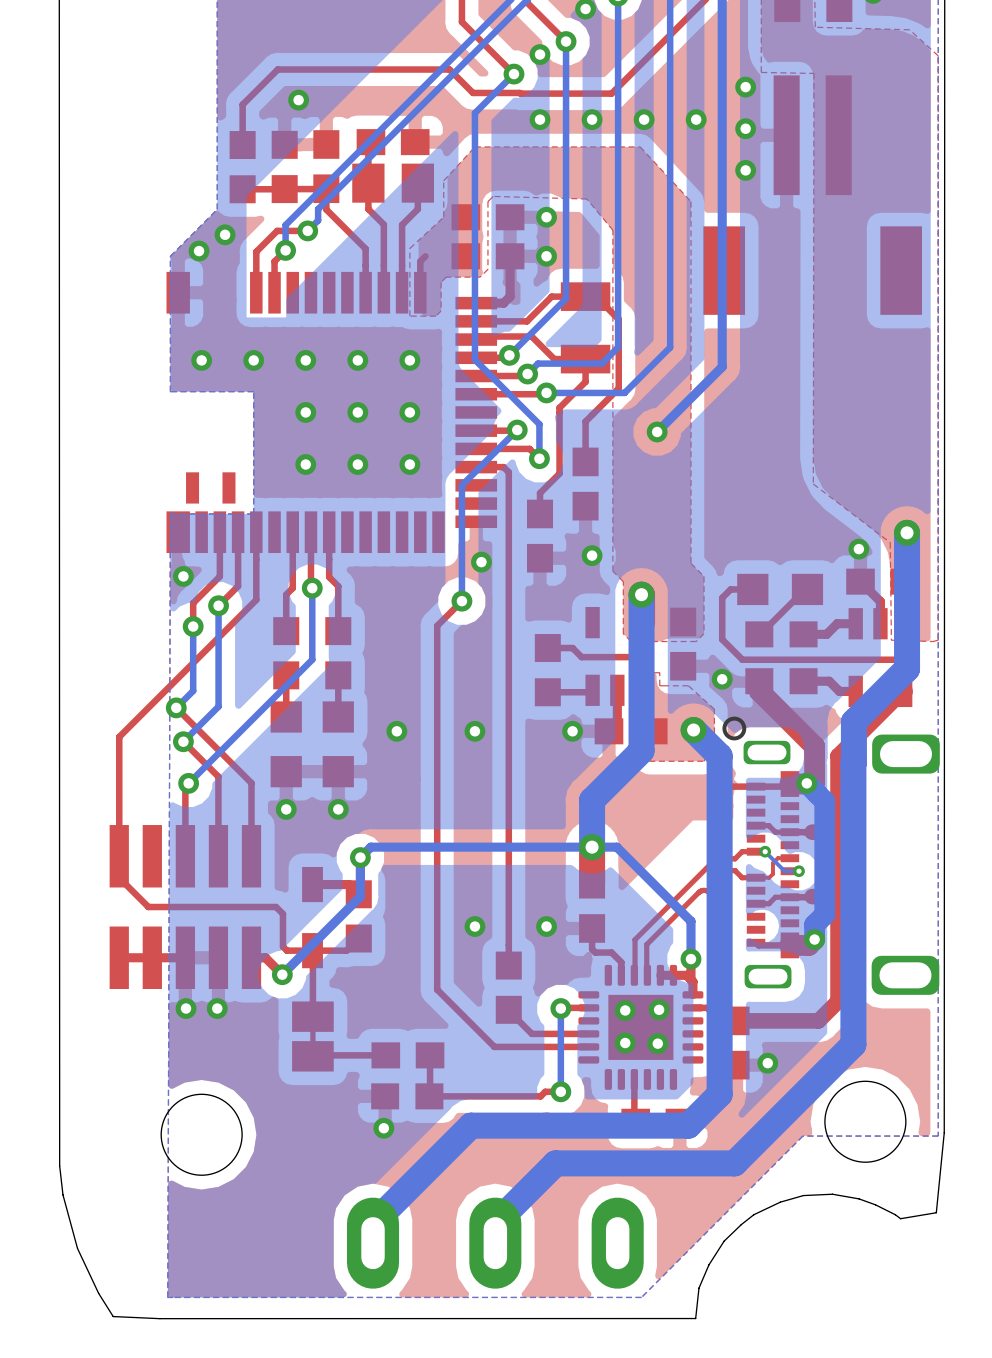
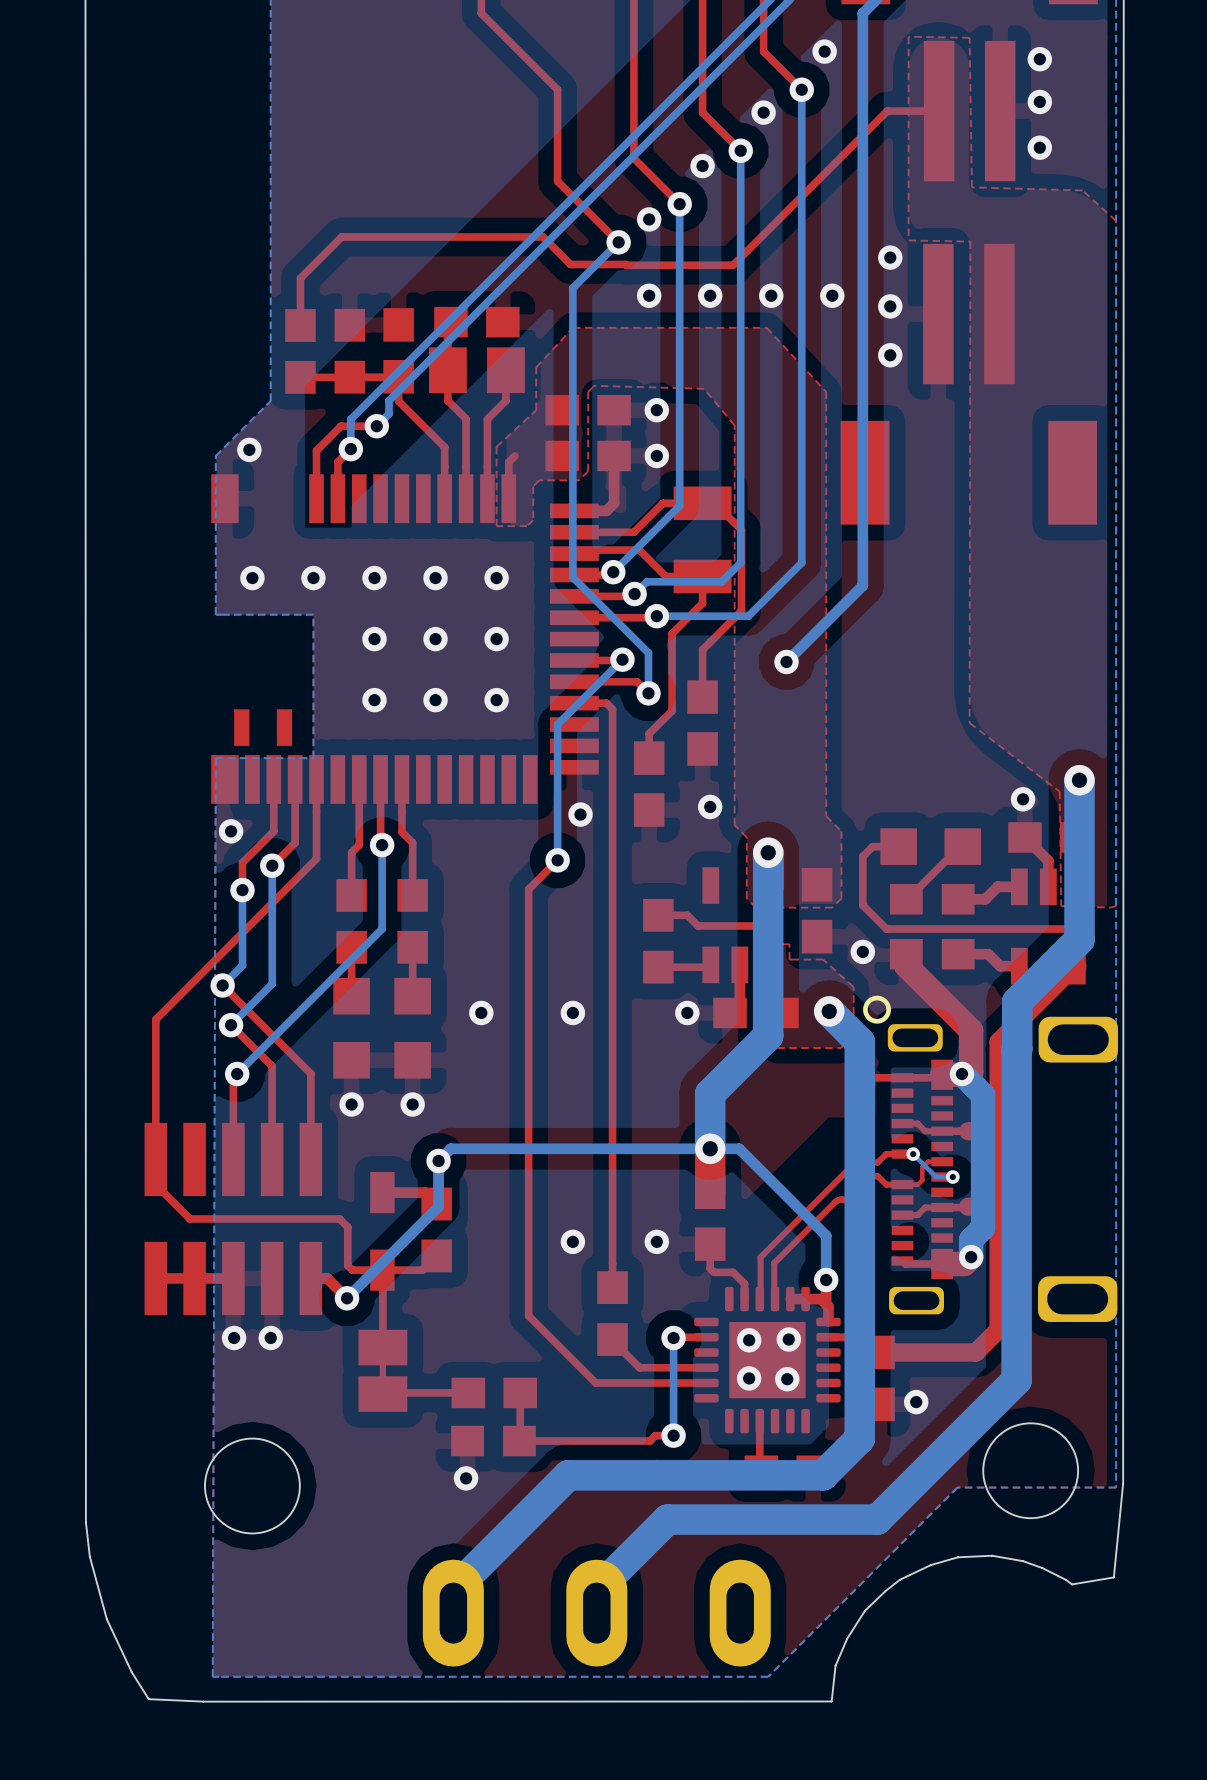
via: (298, 100) -> none
via: (225, 234) -> none

